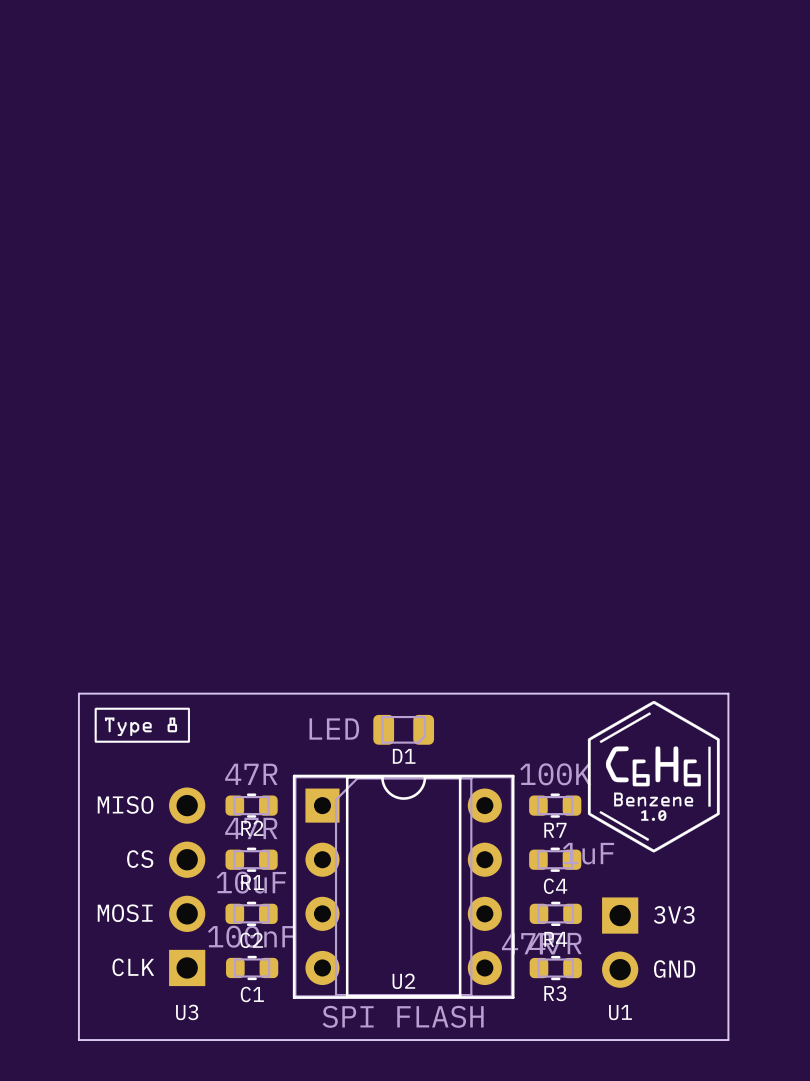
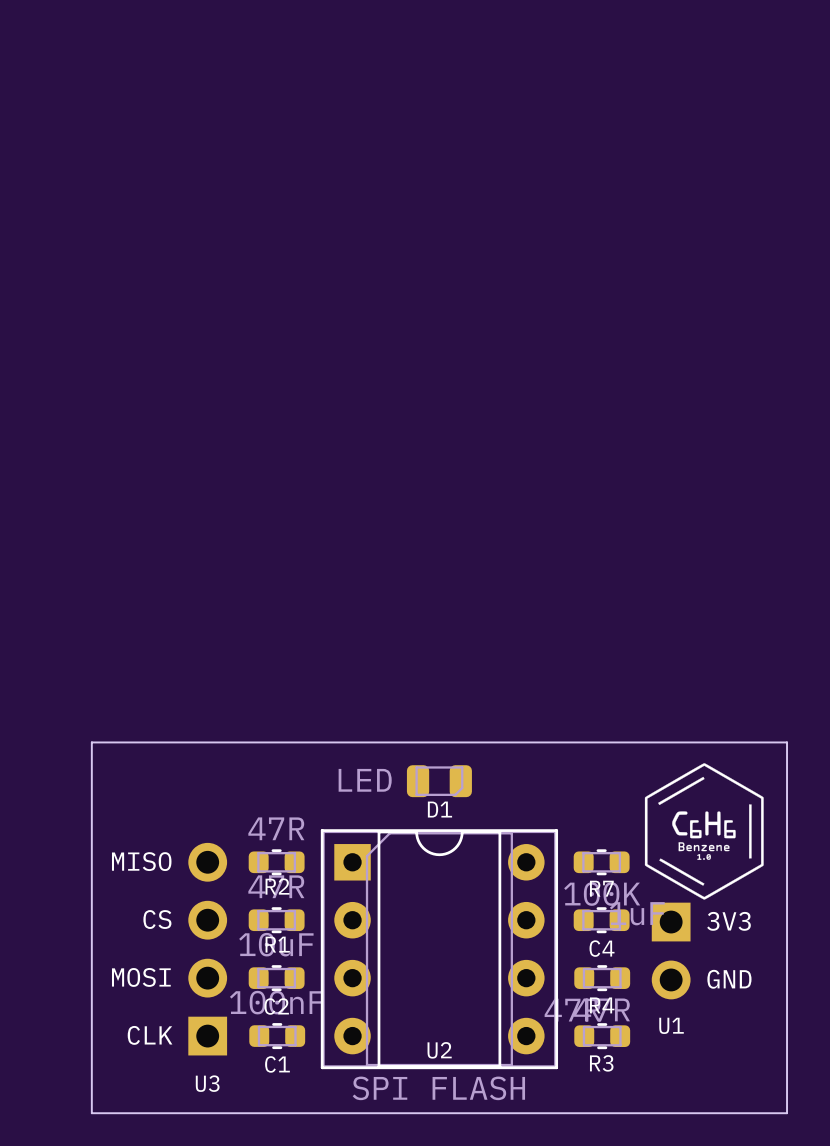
drawing shape: [587, 700, 720, 853] -> [644, 763, 764, 900]
drawing: [94, 707, 191, 743] -> none
R7 value position: 100K (555, 774) -> 100K (602, 894)
text: none -> 3V3 (729, 921)
text: 3V3 (674, 914) -> GND (729, 979)
U1 position: (620, 942) -> (671, 951)
text: GND (674, 969) -> none

